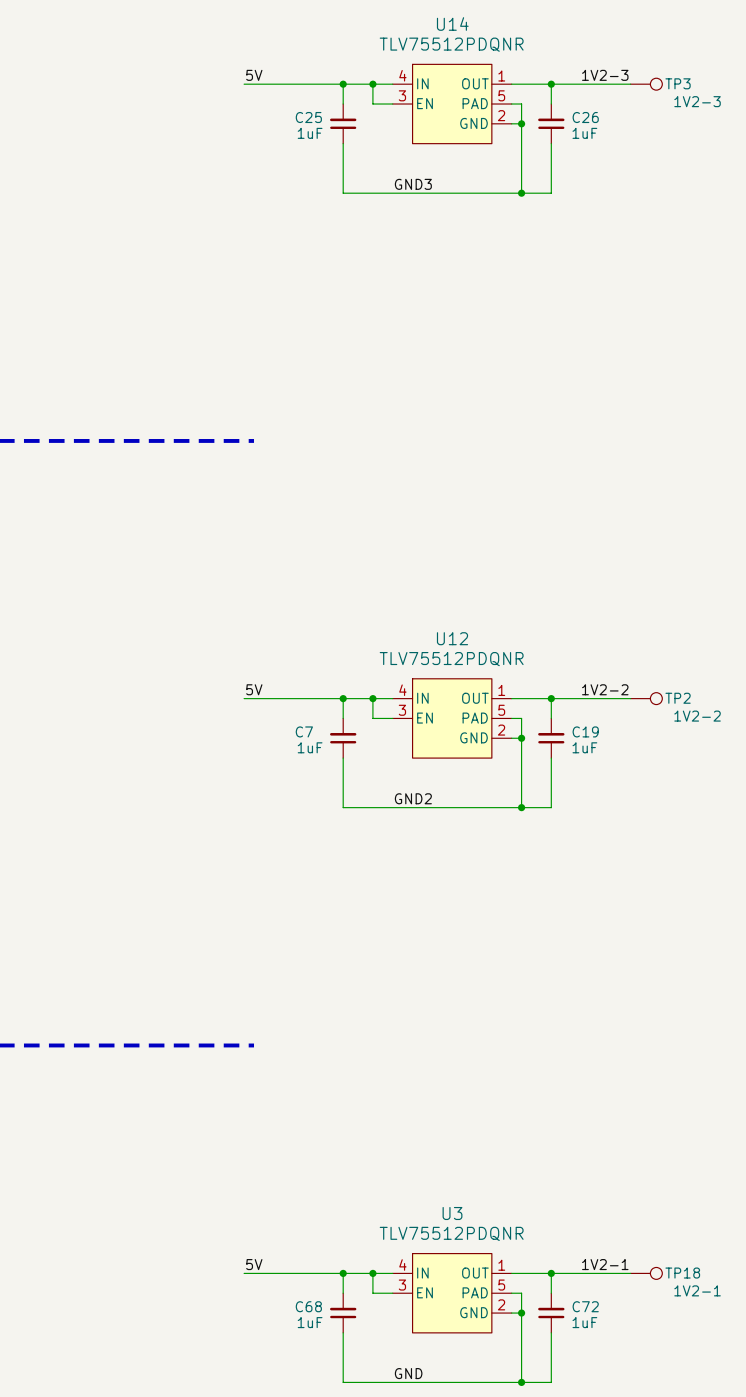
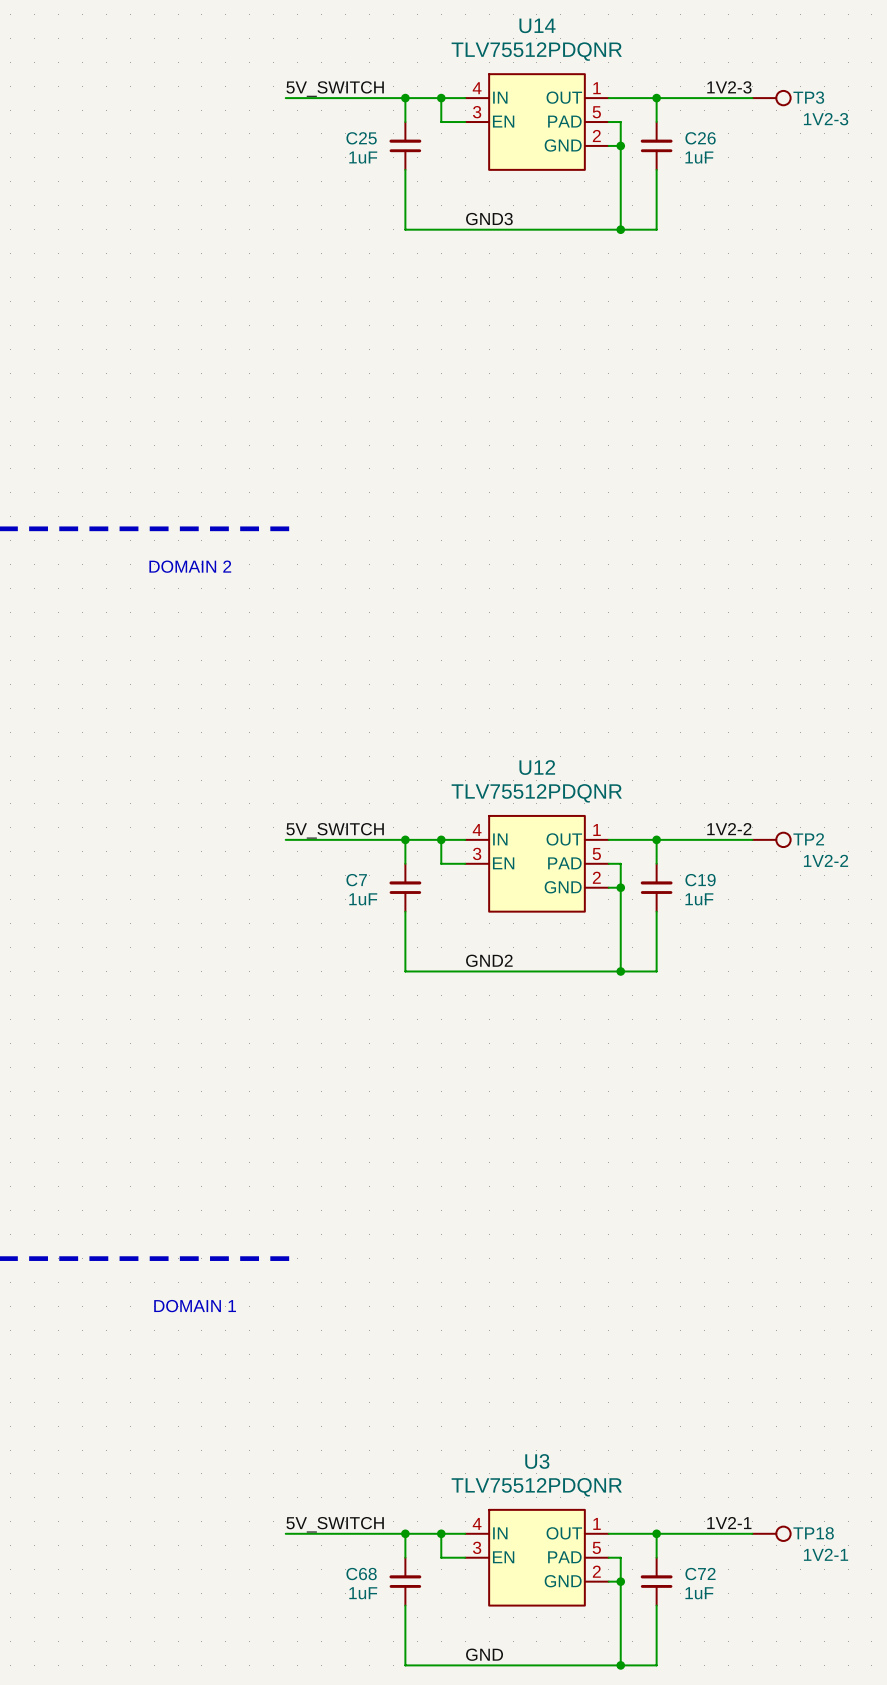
label: 5V (254, 75) -> 5V_SWITCH (335, 89)
text: none -> DOMAIN 2 (190, 566)
label: 5V (254, 689) -> 5V_SWITCH (335, 830)
text: none -> DOMAIN 1 (195, 1306)
label: 5V (254, 1264) -> 5V_SWITCH (335, 1524)

